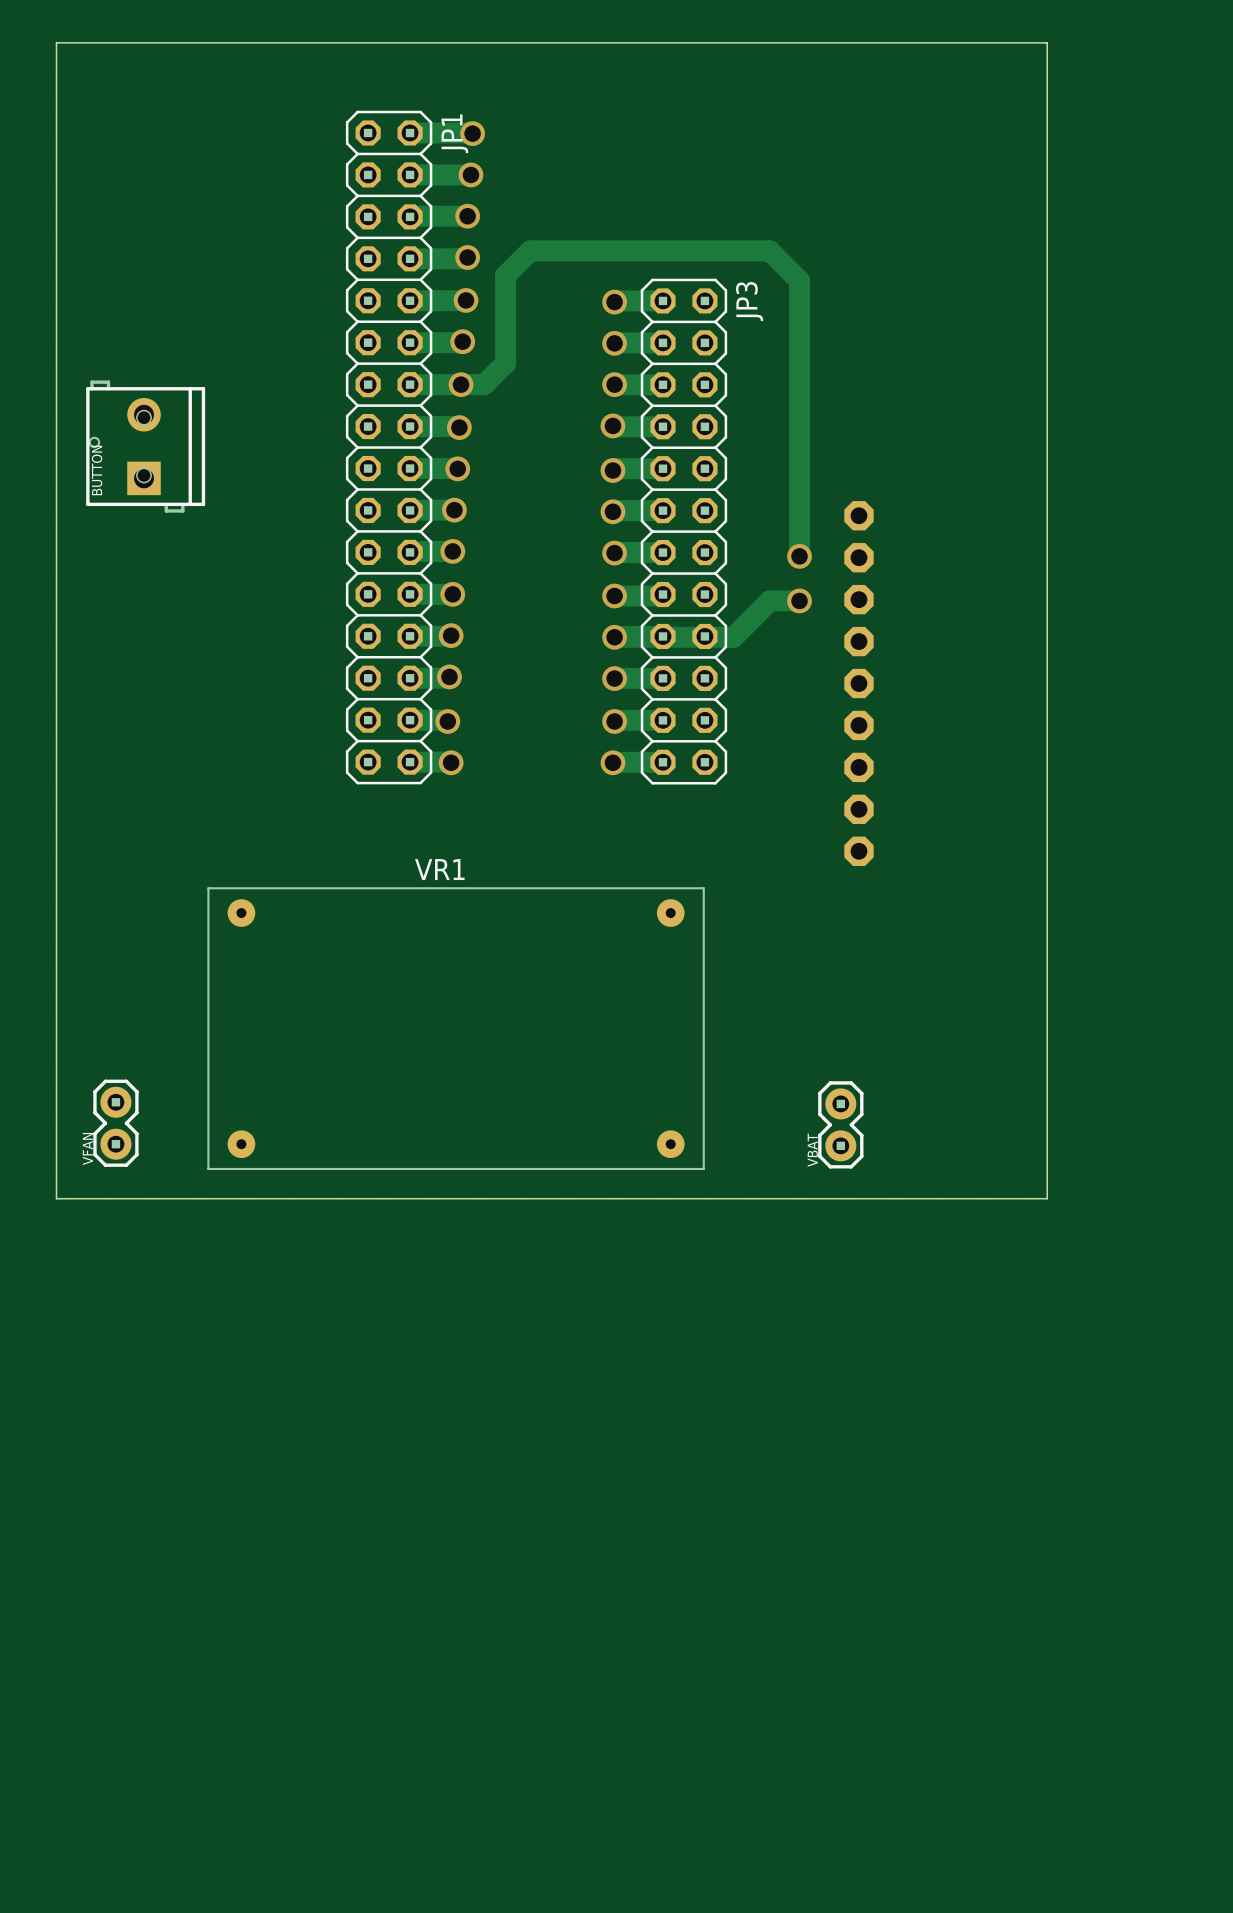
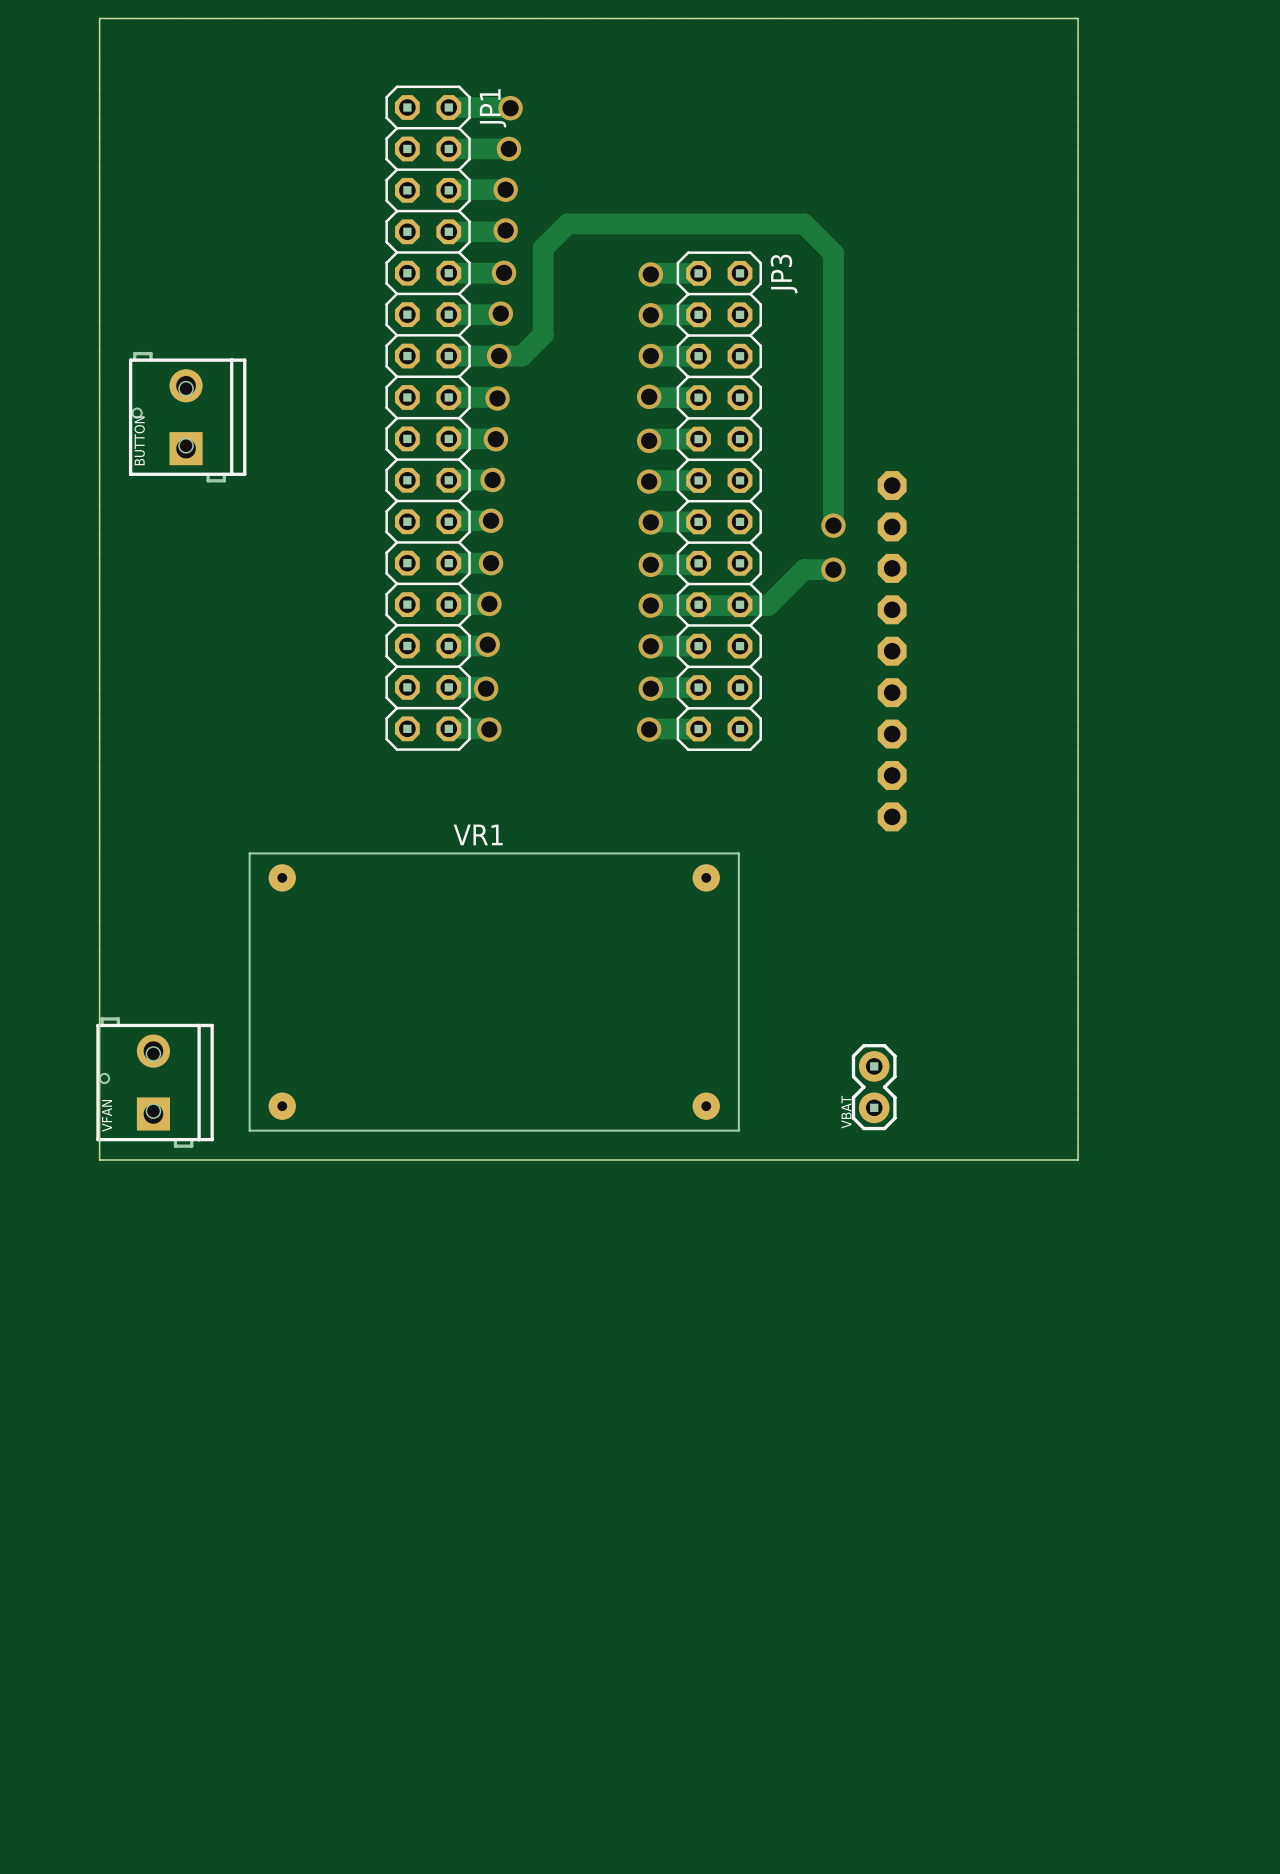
VFAN footprint: [93, 1079, 139, 1167] -> [96, 1017, 214, 1148]

